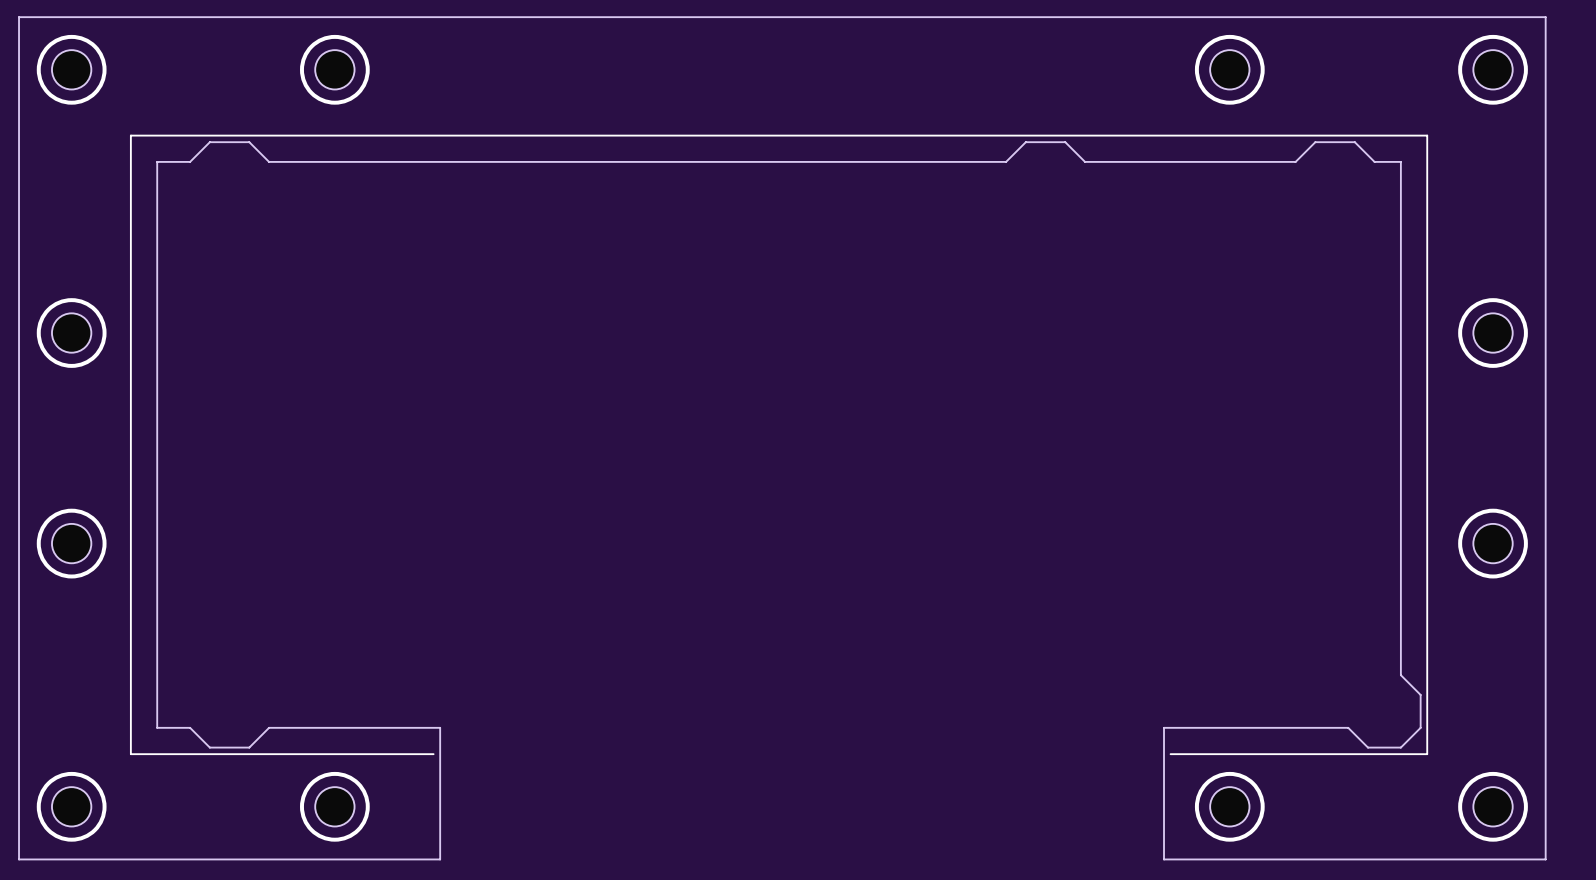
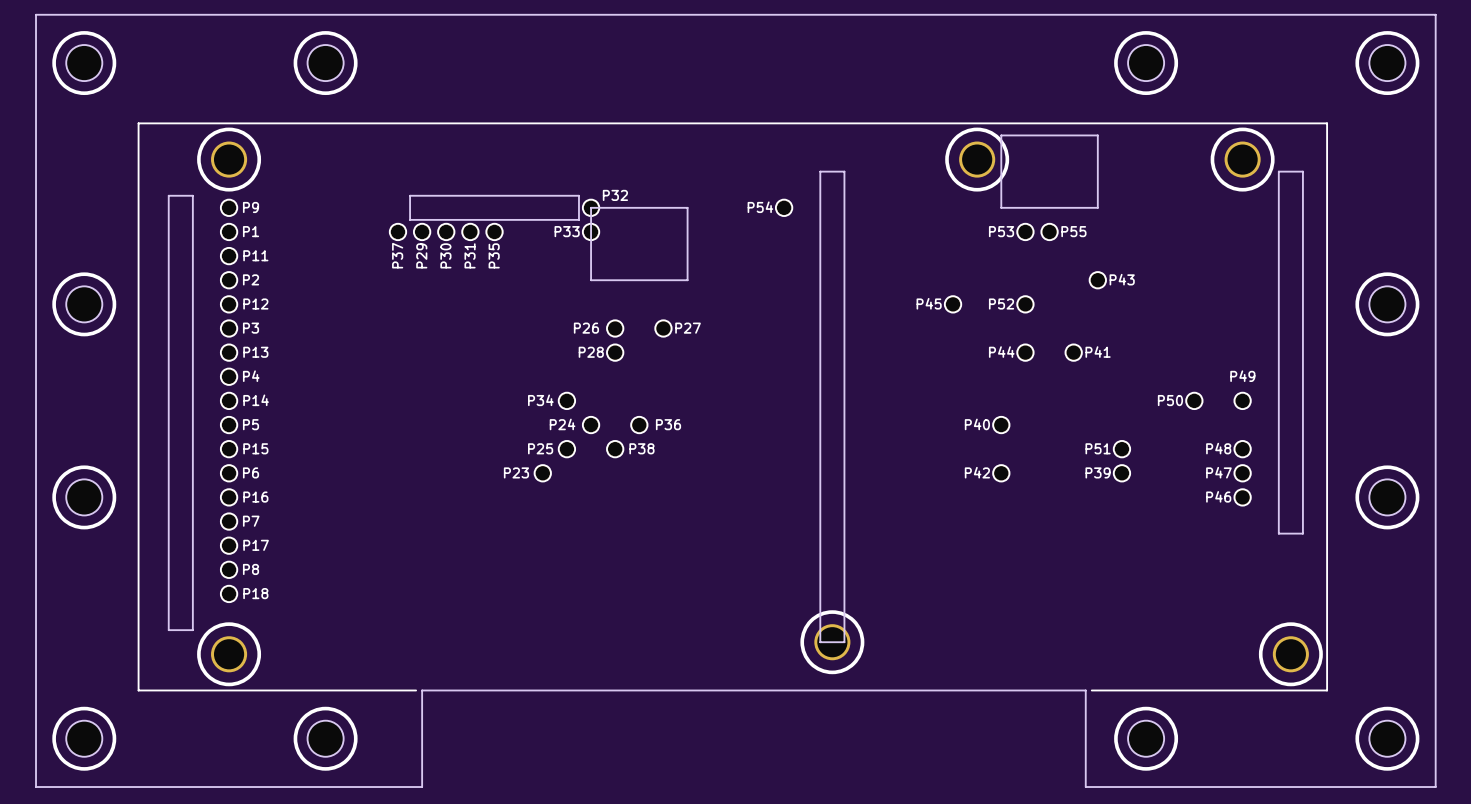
board edge: none -> (1001, 135) (1097, 135) (1097, 207) (1001, 207) (1001, 135)
part: none -> (229, 159)
part: none -> (977, 159)
part: none -> (1242, 159)
board edge: none -> (820, 171) (820, 642) (844, 642) (844, 171) (820, 171)
board edge: (1400, 188) (1400, 161) (1374, 161) (1354, 142) (1315, 142) (1295, 161) (1085, 161) (1065, 142) (1025, 142) (1006, 161) (269, 161) (249, 142) (209, 142) (190, 161) (157, 161) (157, 727) (190, 727) (209, 747) (249, 747) (269, 727) (440, 727) (440, 754) -> (1085, 690) (422, 690)
board edge: none -> (168, 195) (168, 630) (192, 630) (192, 195) (168, 195)
board edge: none -> (410, 195) (578, 195) (578, 219) (410, 219) (410, 195)
P9: none -> (229, 207)
board edge: none -> (591, 207) (687, 207) (687, 280) (591, 280) (591, 207)
P32: none -> (591, 207)
P54: none -> (784, 207)
P1: none -> (229, 231)
P37: none -> (397, 231)
P29: none -> (422, 231)
P30: none -> (446, 231)
P31: none -> (470, 231)
P35: none -> (494, 231)
P33: none -> (591, 231)
P53: none -> (1025, 231)
P55: none -> (1049, 231)
P11: none -> (229, 256)
P2: none -> (229, 280)
P43: none -> (1097, 280)
P12: none -> (229, 304)
P45: none -> (953, 304)
P52: none -> (1025, 304)
P3: none -> (229, 328)
P26: none -> (615, 328)
P27: none -> (663, 328)
P13: none -> (229, 352)
P28: none -> (615, 352)
P44: none -> (1025, 352)
P41: none -> (1073, 352)
P4: none -> (229, 376)
P14: none -> (229, 400)
P34: none -> (566, 400)
P50: none -> (1194, 400)
P49: none -> (1242, 400)
P5: none -> (229, 425)
P24: none -> (591, 425)
P36: none -> (639, 425)
P40: none -> (1001, 425)
P15: none -> (229, 449)
P25: none -> (566, 449)
P38: none -> (615, 449)
P51: none -> (1121, 449)
P48: none -> (1242, 449)
P6: none -> (229, 473)
P23: none -> (542, 473)
P42: none -> (1001, 473)
P39: none -> (1121, 473)
P47: none -> (1242, 473)
P16: none -> (229, 497)
P46: none -> (1242, 497)
P7: none -> (229, 521)
board edge: (1400, 583) (1400, 675) (1420, 694) (1420, 727) (1400, 747) (1368, 747) (1348, 727) (1164, 727) (1164, 754) -> (1302, 533) (1278, 533) (1278, 171) (1302, 171)
P17: none -> (229, 545)
P8: none -> (229, 569)
P18: none -> (229, 593)
part: none -> (832, 642)
part: none -> (229, 654)
part: none -> (1290, 654)

